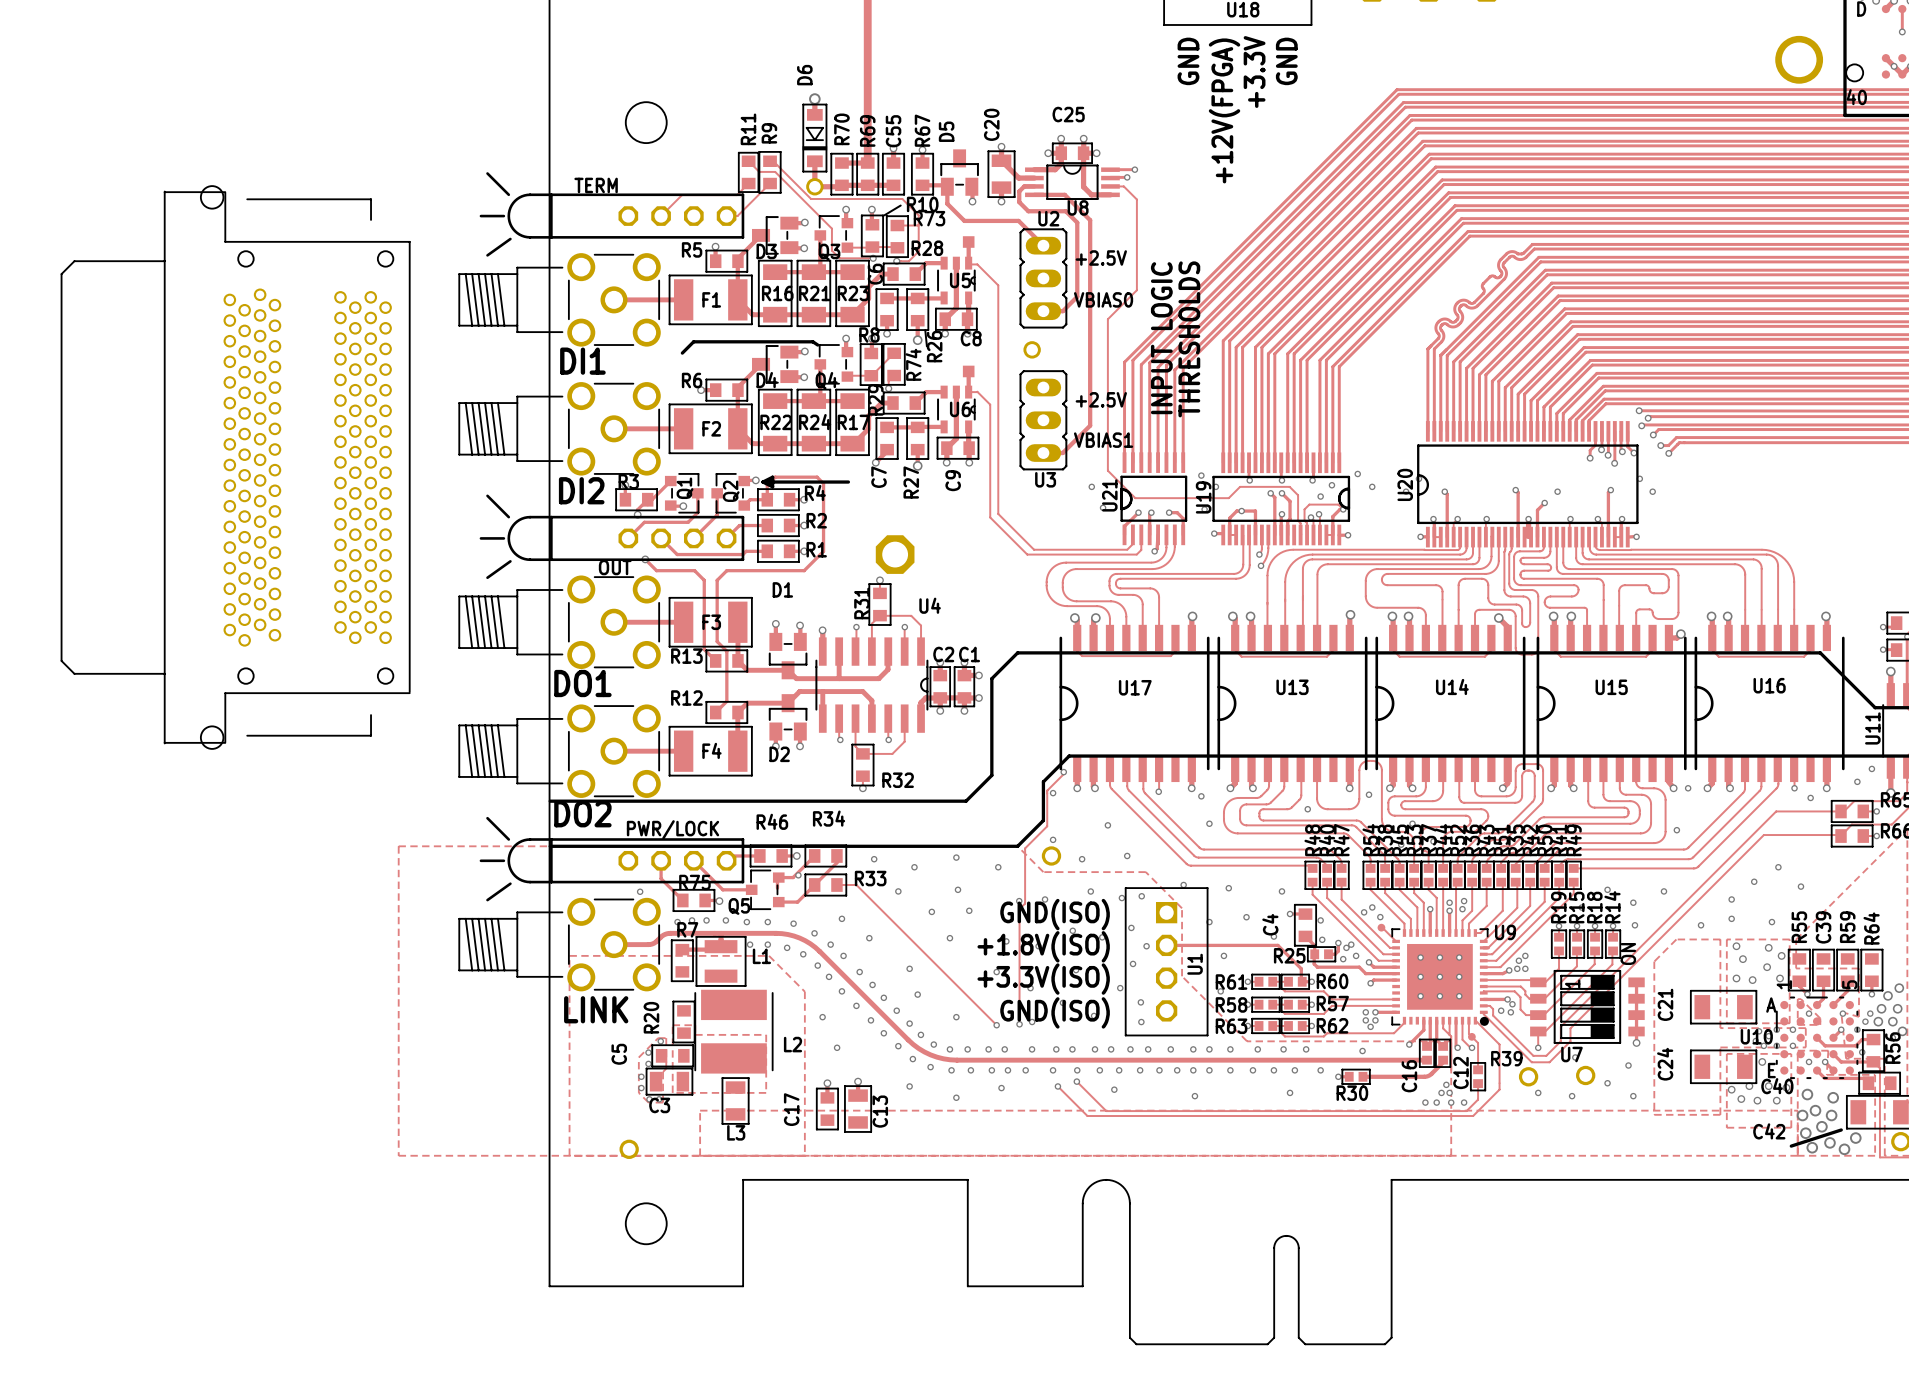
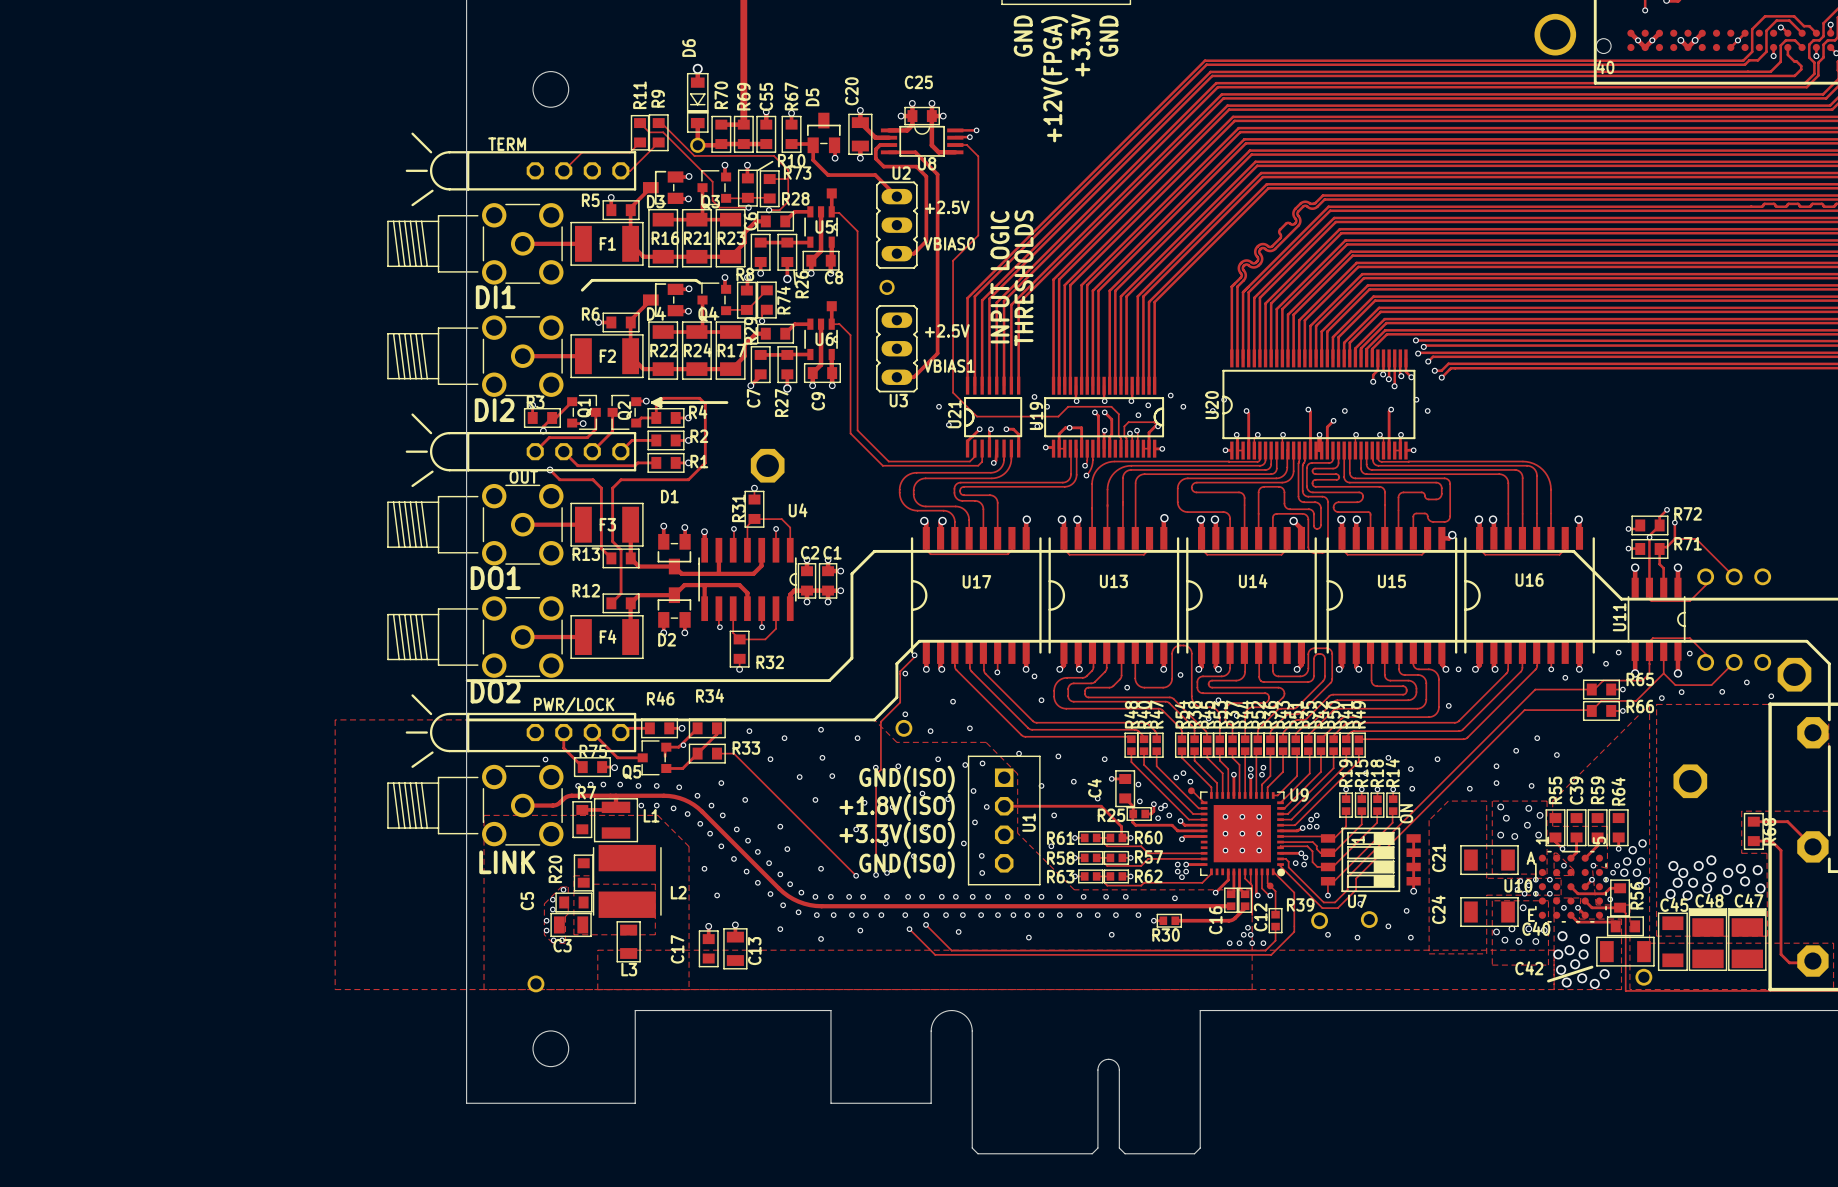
part: (235, 467) -> none

